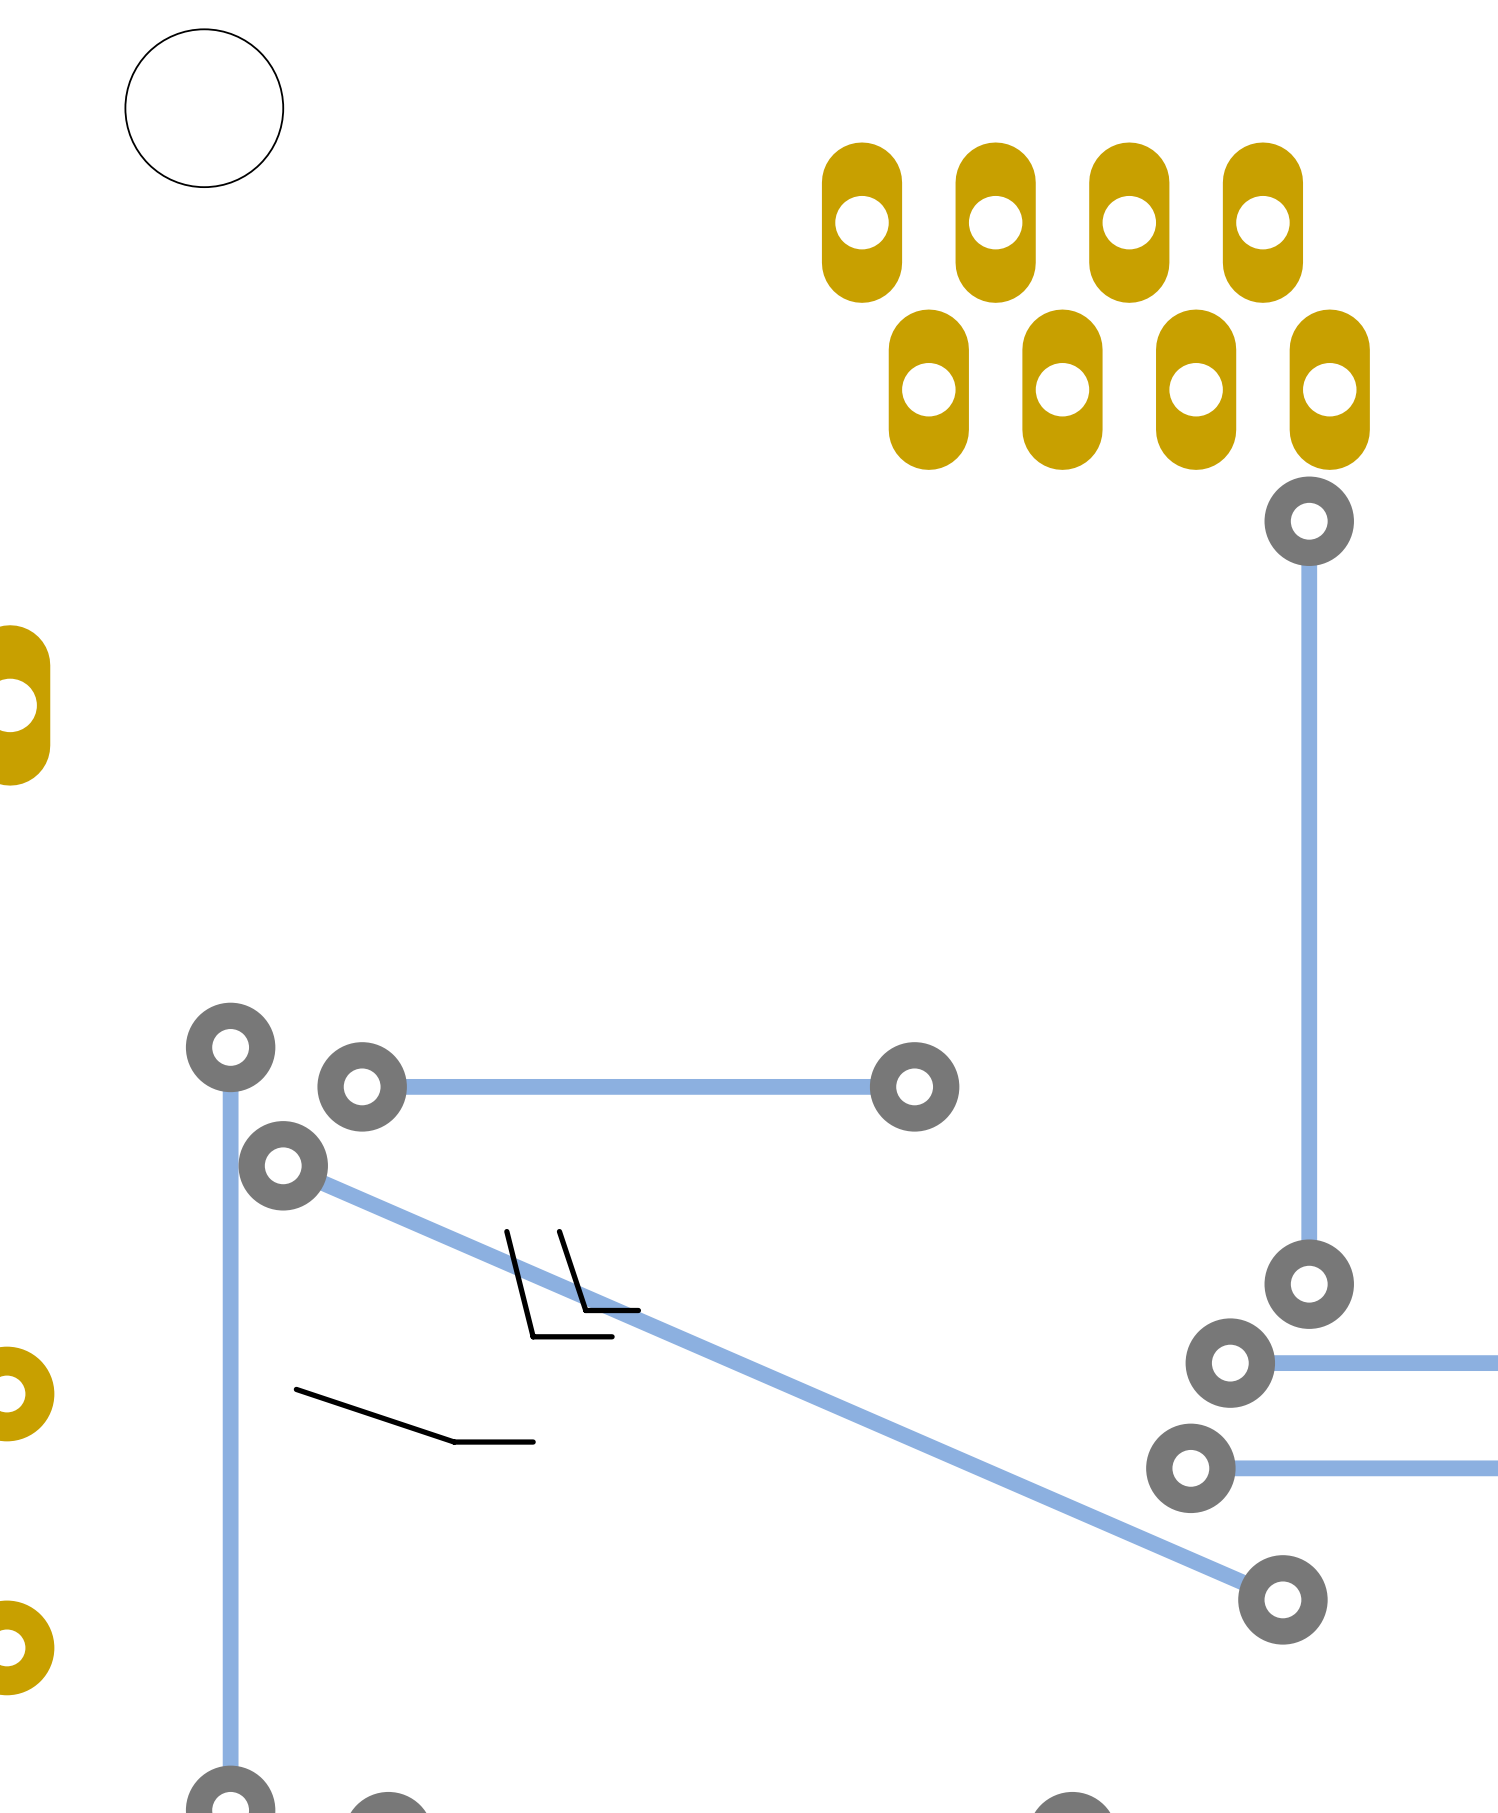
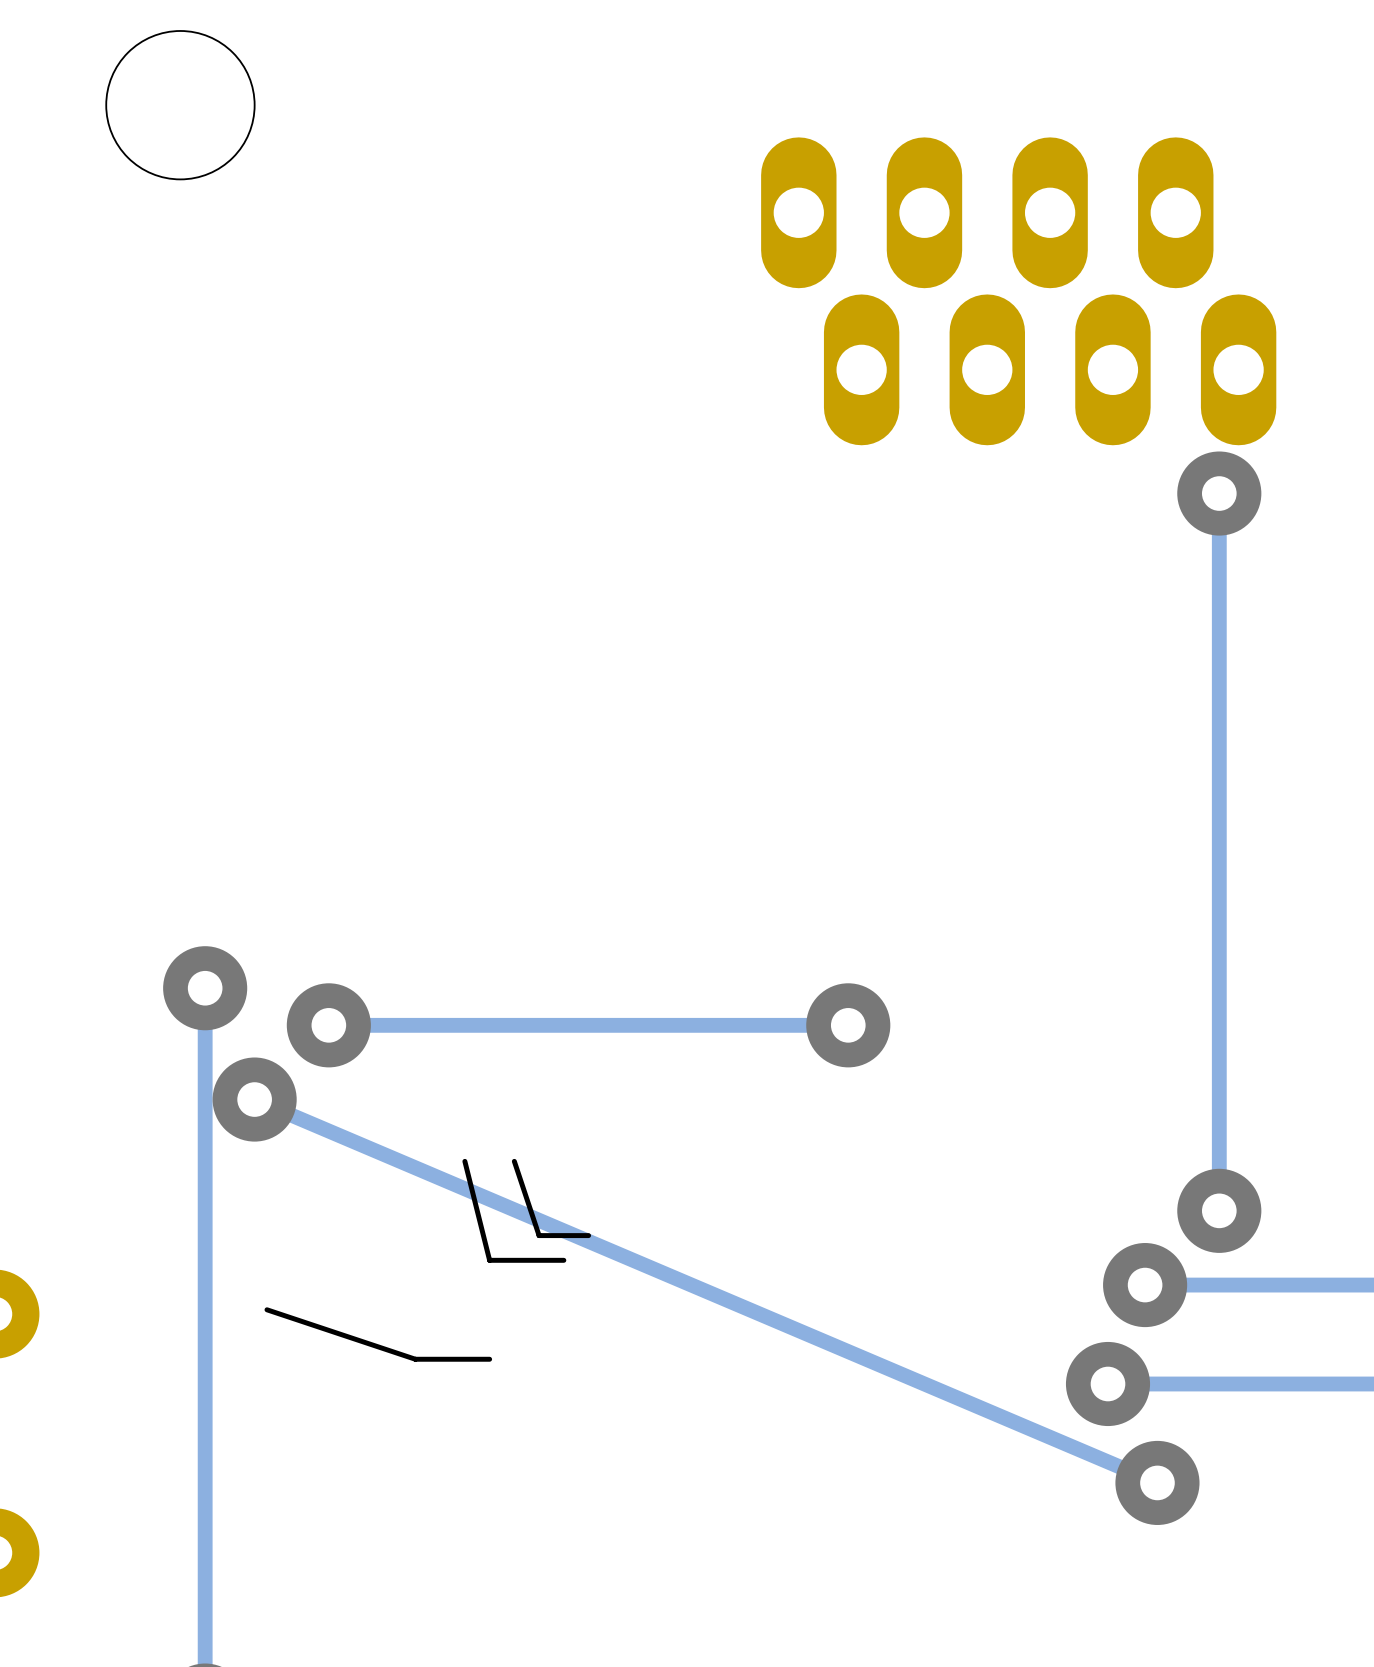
track: (283, 1165) (1282, 1599) -> (254, 1099) (1157, 1482)
via position: (1282, 1599) -> (1157, 1482)

